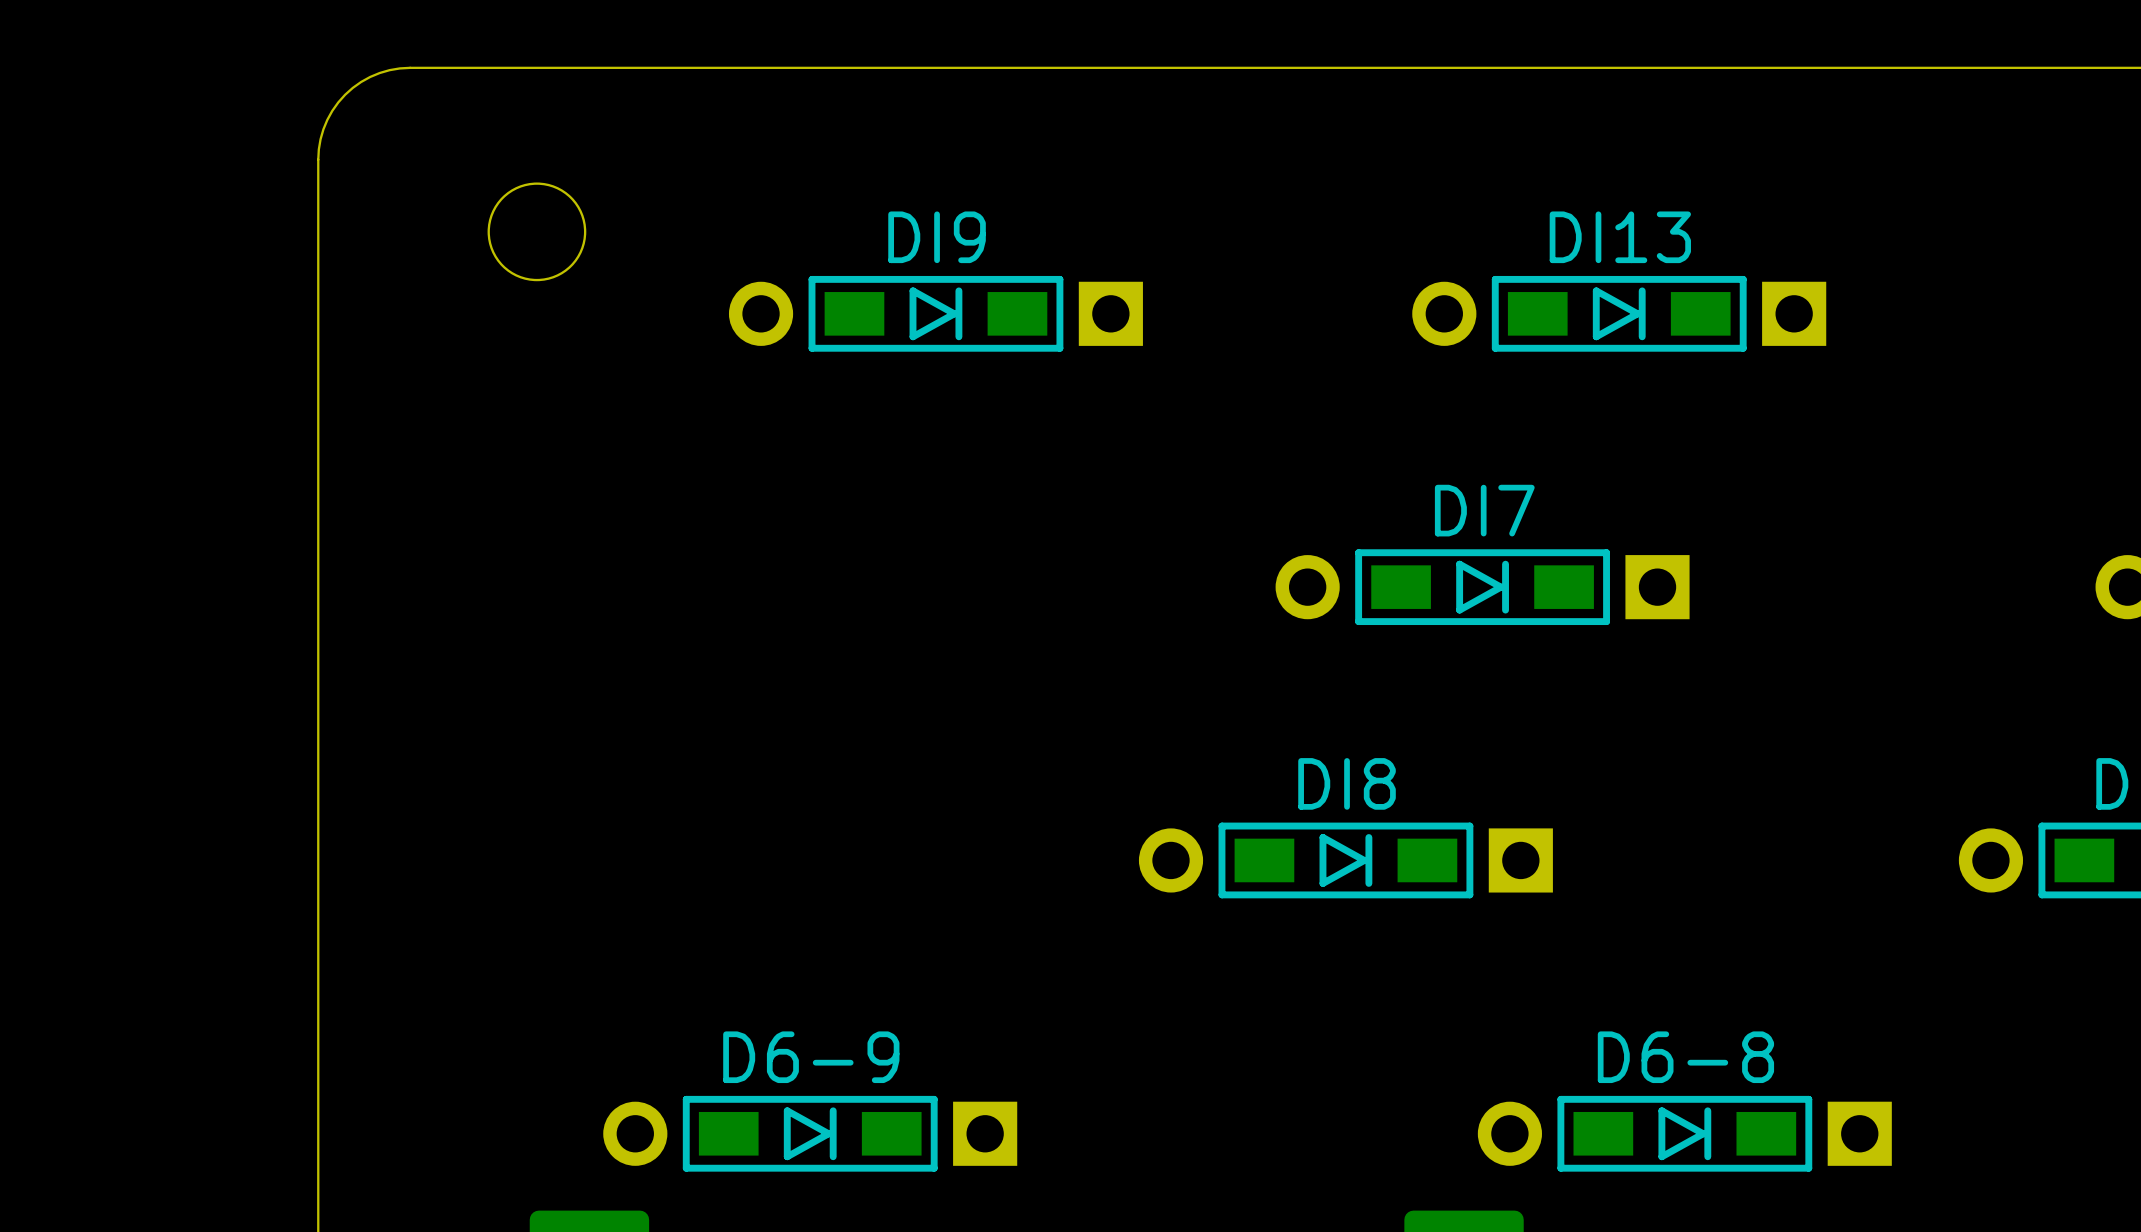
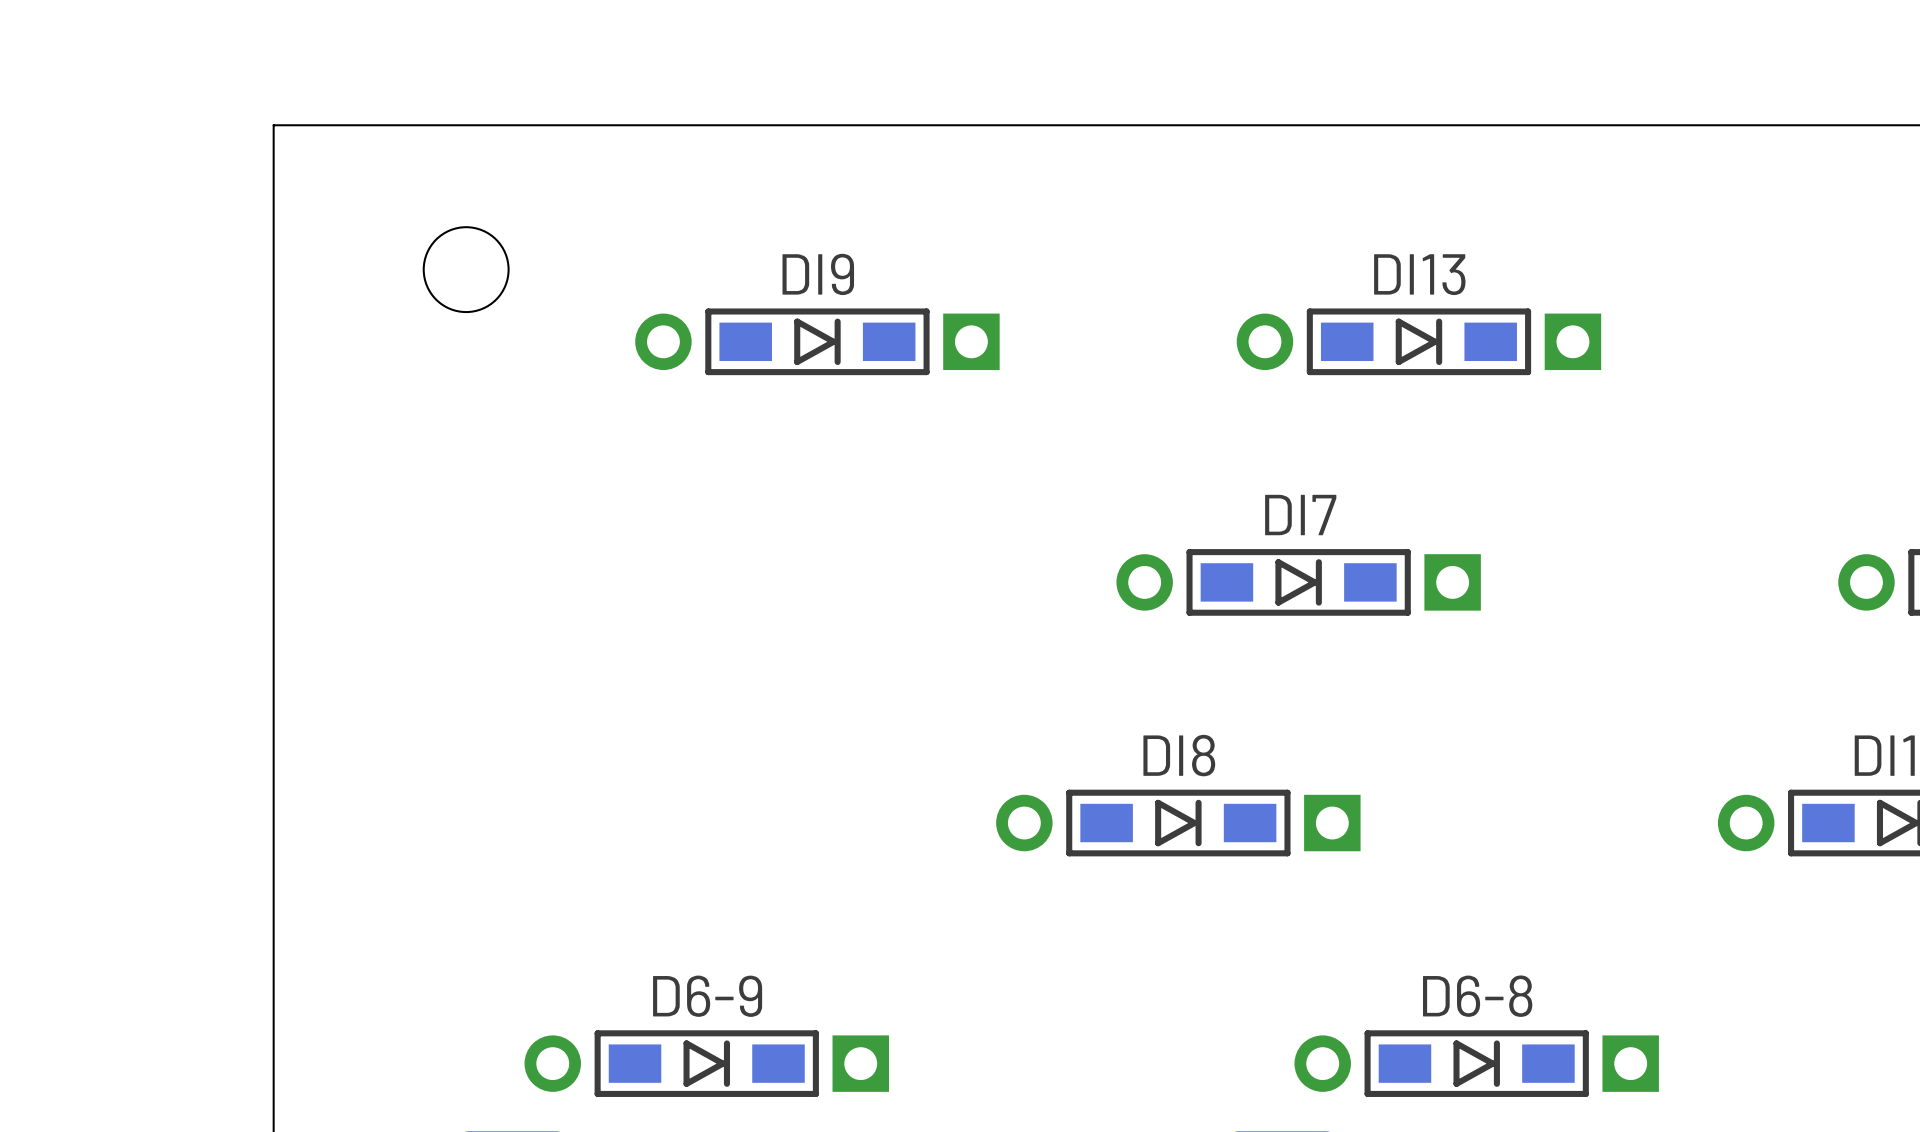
board edge: (410, 67) (389, 70) (370, 76) (345, 94) (332, 110) (323, 129) (318, 159) -> (354, 125) (273, 125) (273, 206)

